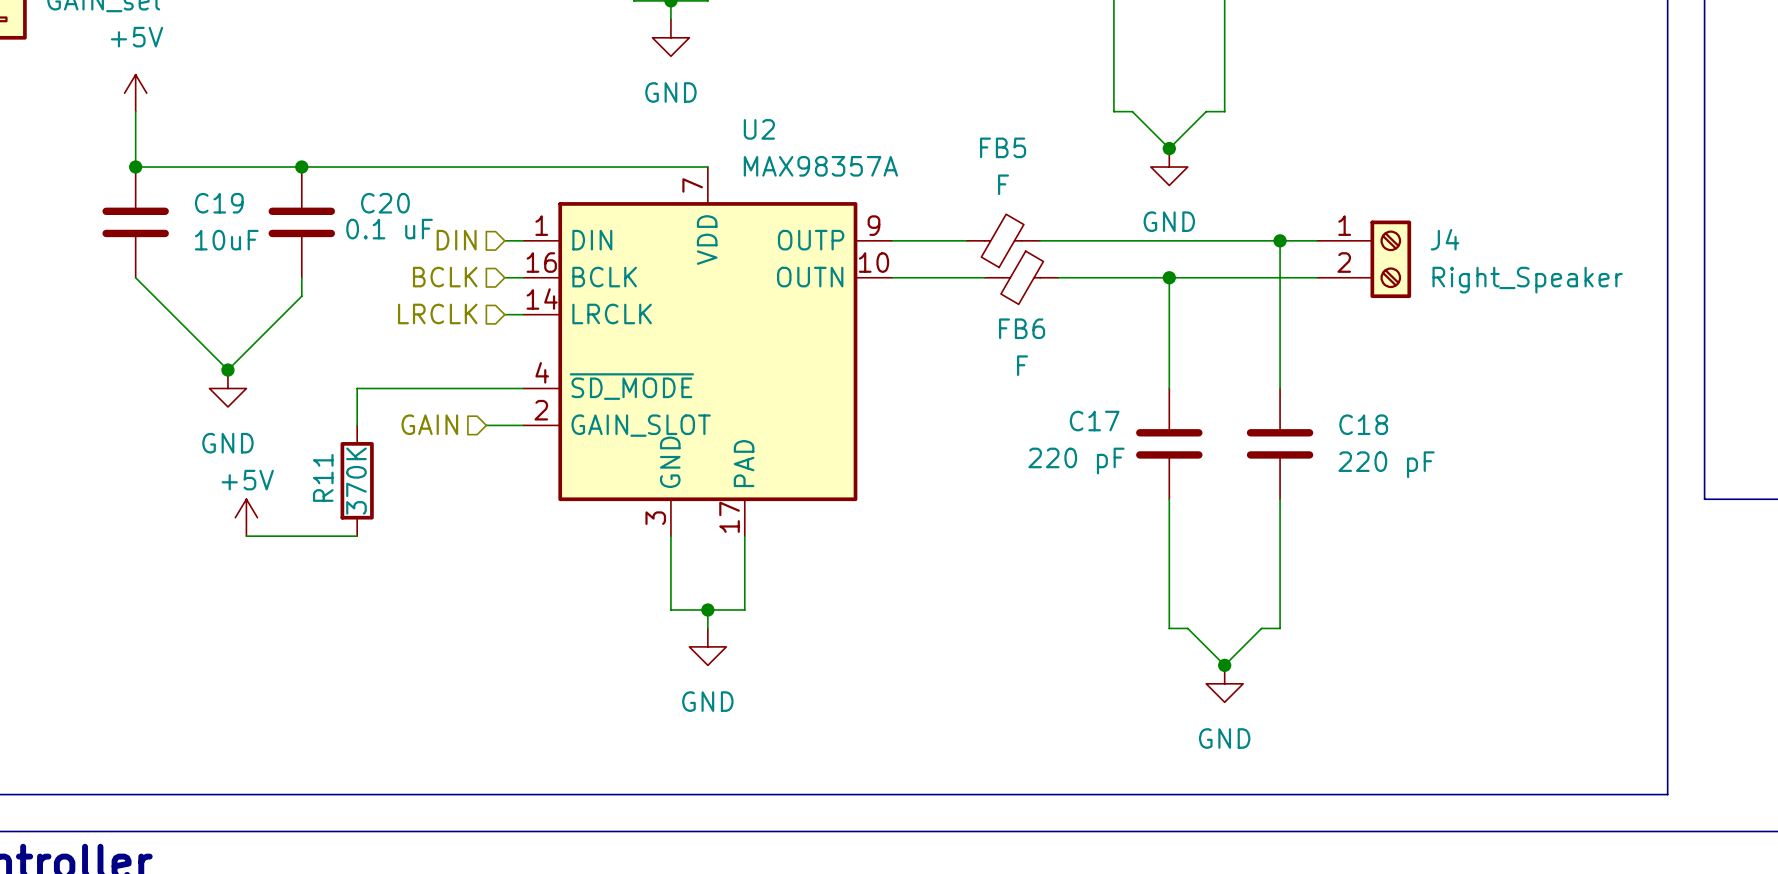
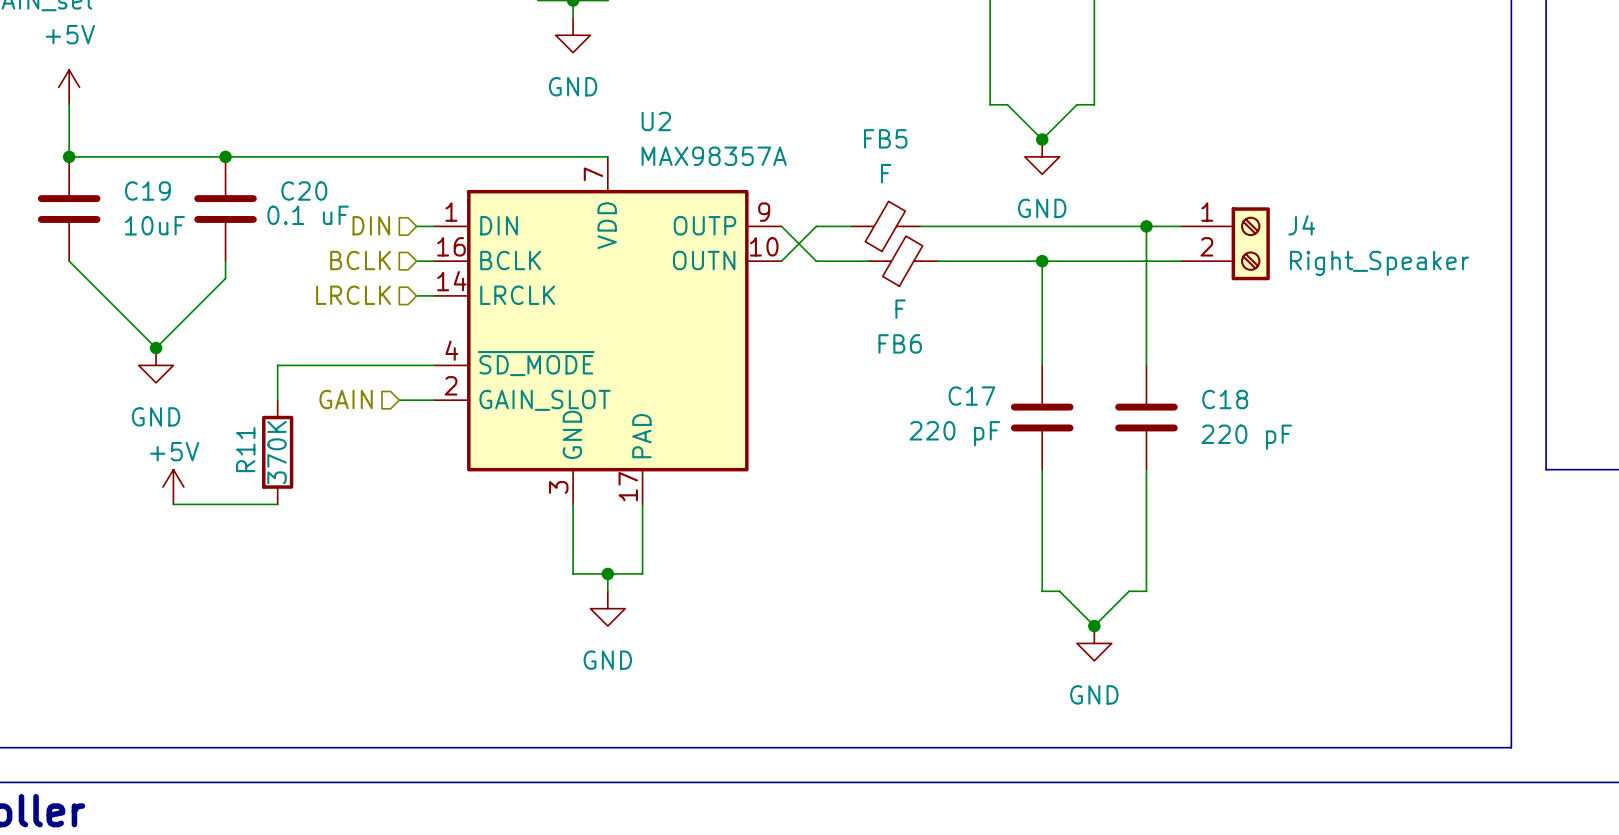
wire: (892, 240) (929, 240) -> (781, 226) (816, 261)
wire: (892, 277) (929, 277) -> (781, 261) (816, 226)
FB6 rotation: 0° (1022, 277) -> 180° (902, 261)
FB6 name position: FB6 (1022, 328) -> FB6 (900, 343)
FB6 value position: F (1022, 365) -> F (900, 309)

